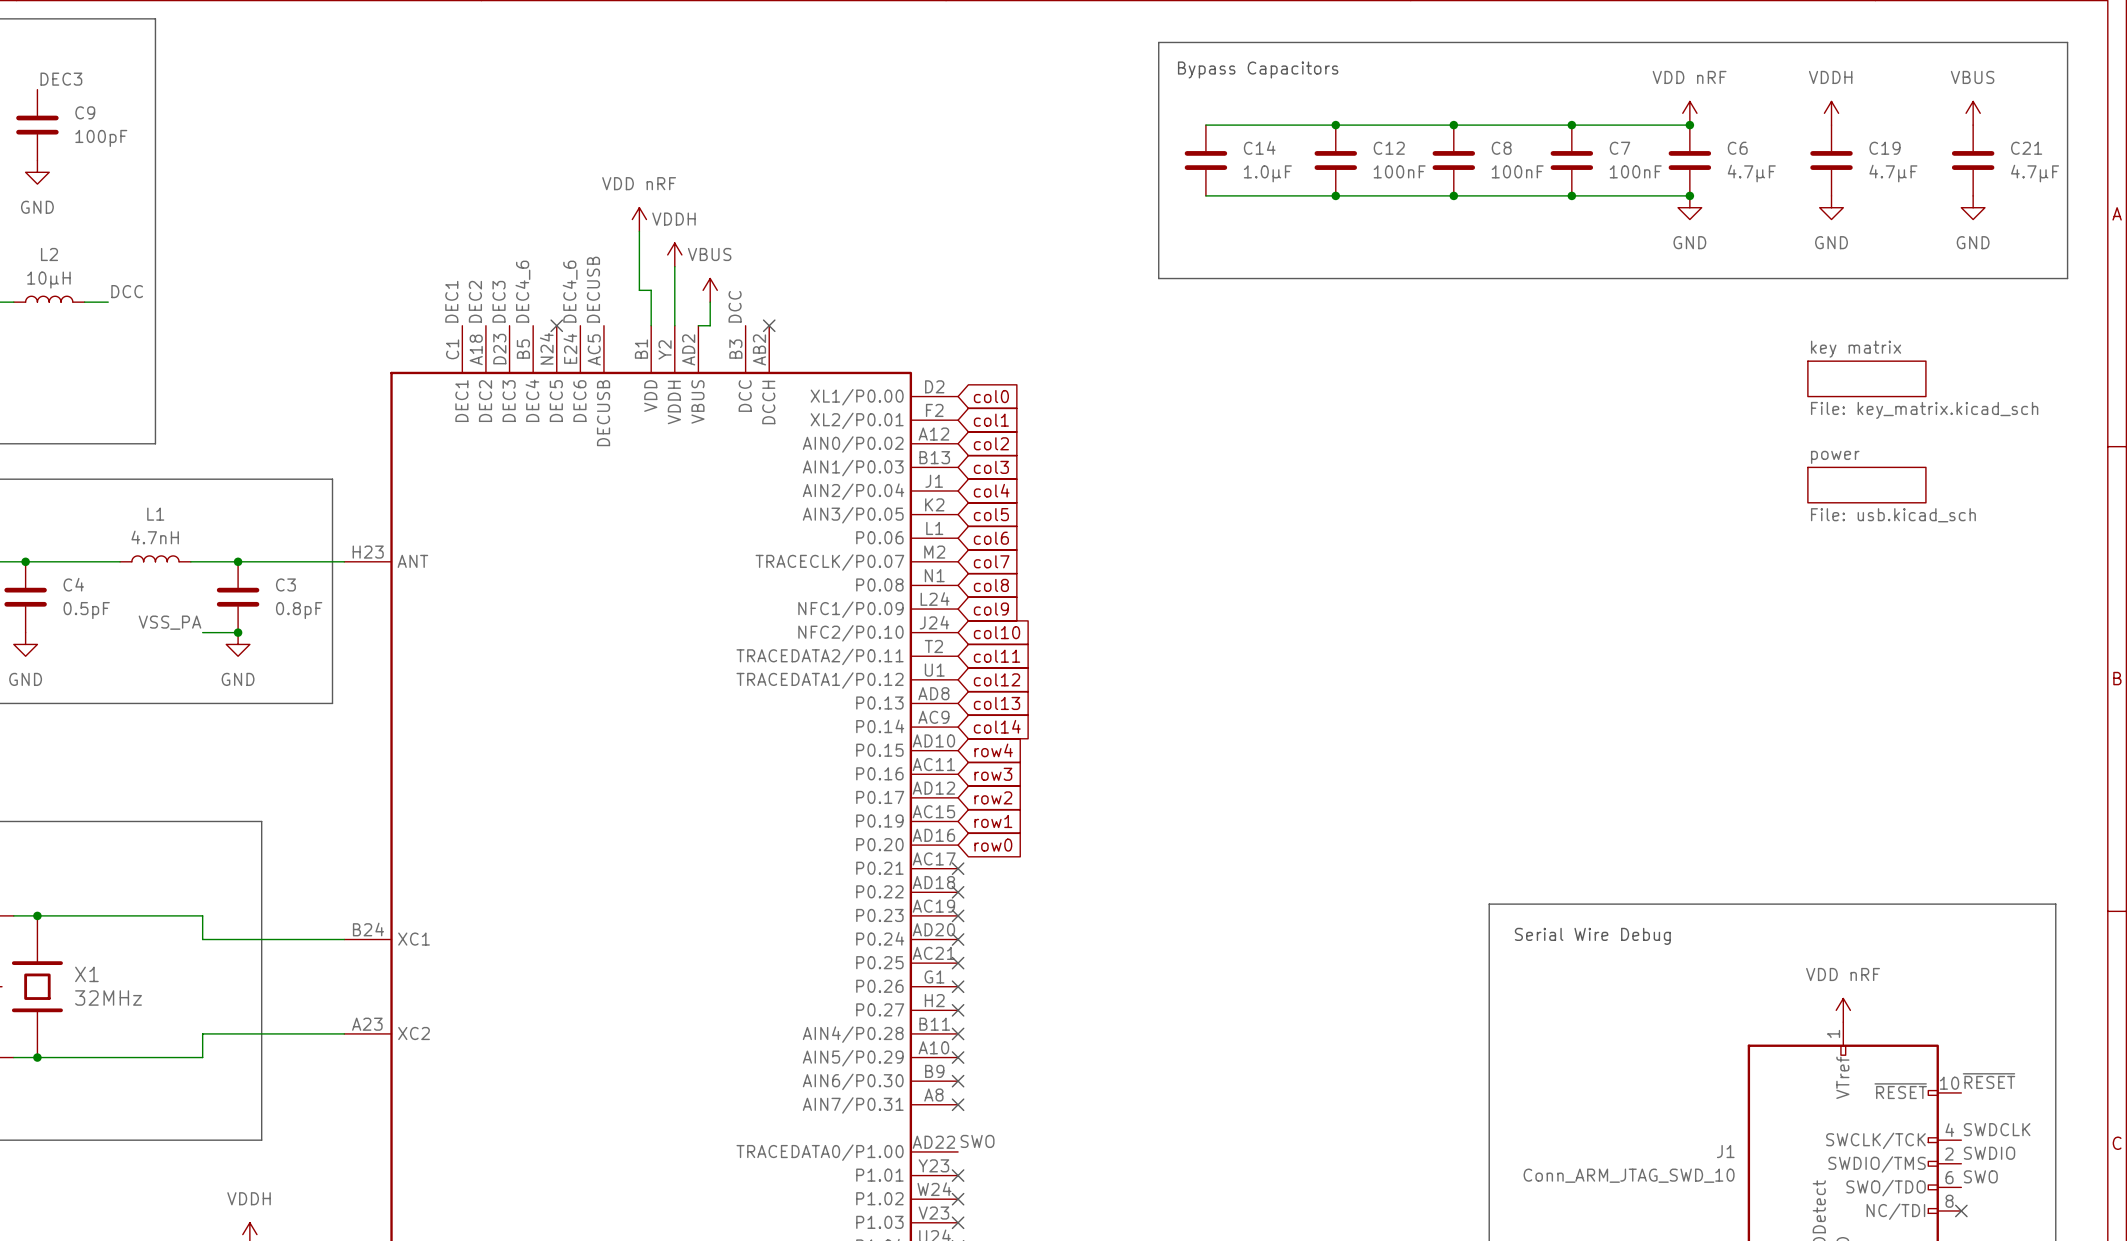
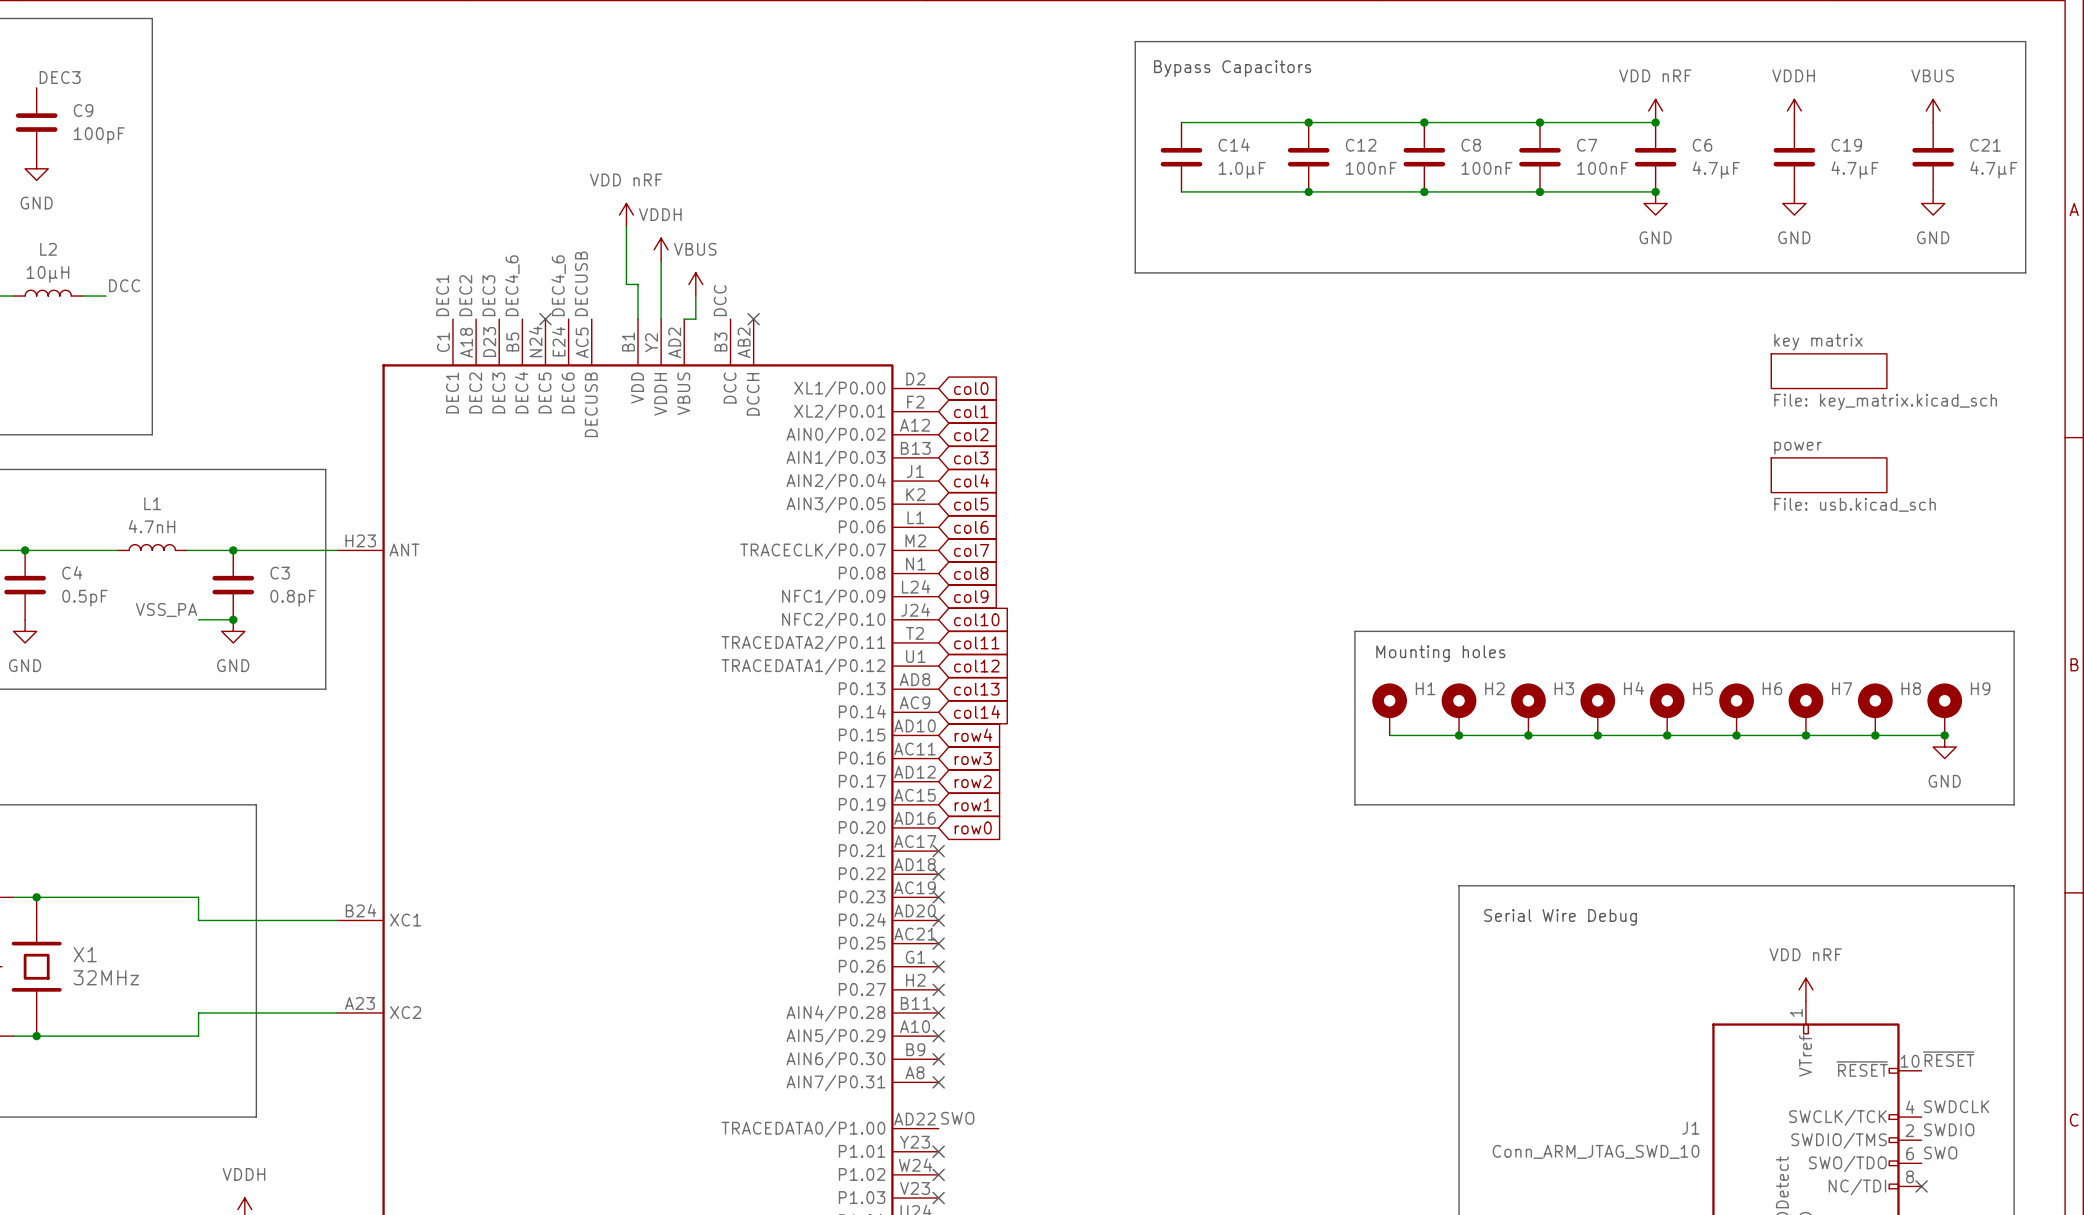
line: none -> (1354, 631) (2014, 631) (2014, 804) (1354, 804) (1354, 631)
text: none -> Mounting holes (1440, 653)
H1: none -> (1389, 709)
H2: none -> (1459, 709)
H3: none -> (1528, 709)
H4: none -> (1597, 709)
H5: none -> (1667, 709)
H6: none -> (1736, 709)
H7: none -> (1805, 709)
H8: none -> (1875, 709)
H9: none -> (1944, 709)
wire: none -> (1389, 735) (1944, 735)
junction: none -> (1459, 735)
junction: none -> (1528, 735)
junction: none -> (1597, 735)
junction: none -> (1667, 735)
junction: none -> (1736, 735)
junction: none -> (1805, 735)
junction: none -> (1875, 735)
junction: none -> (1944, 735)
power symbol: none -> GND (1944, 747)

